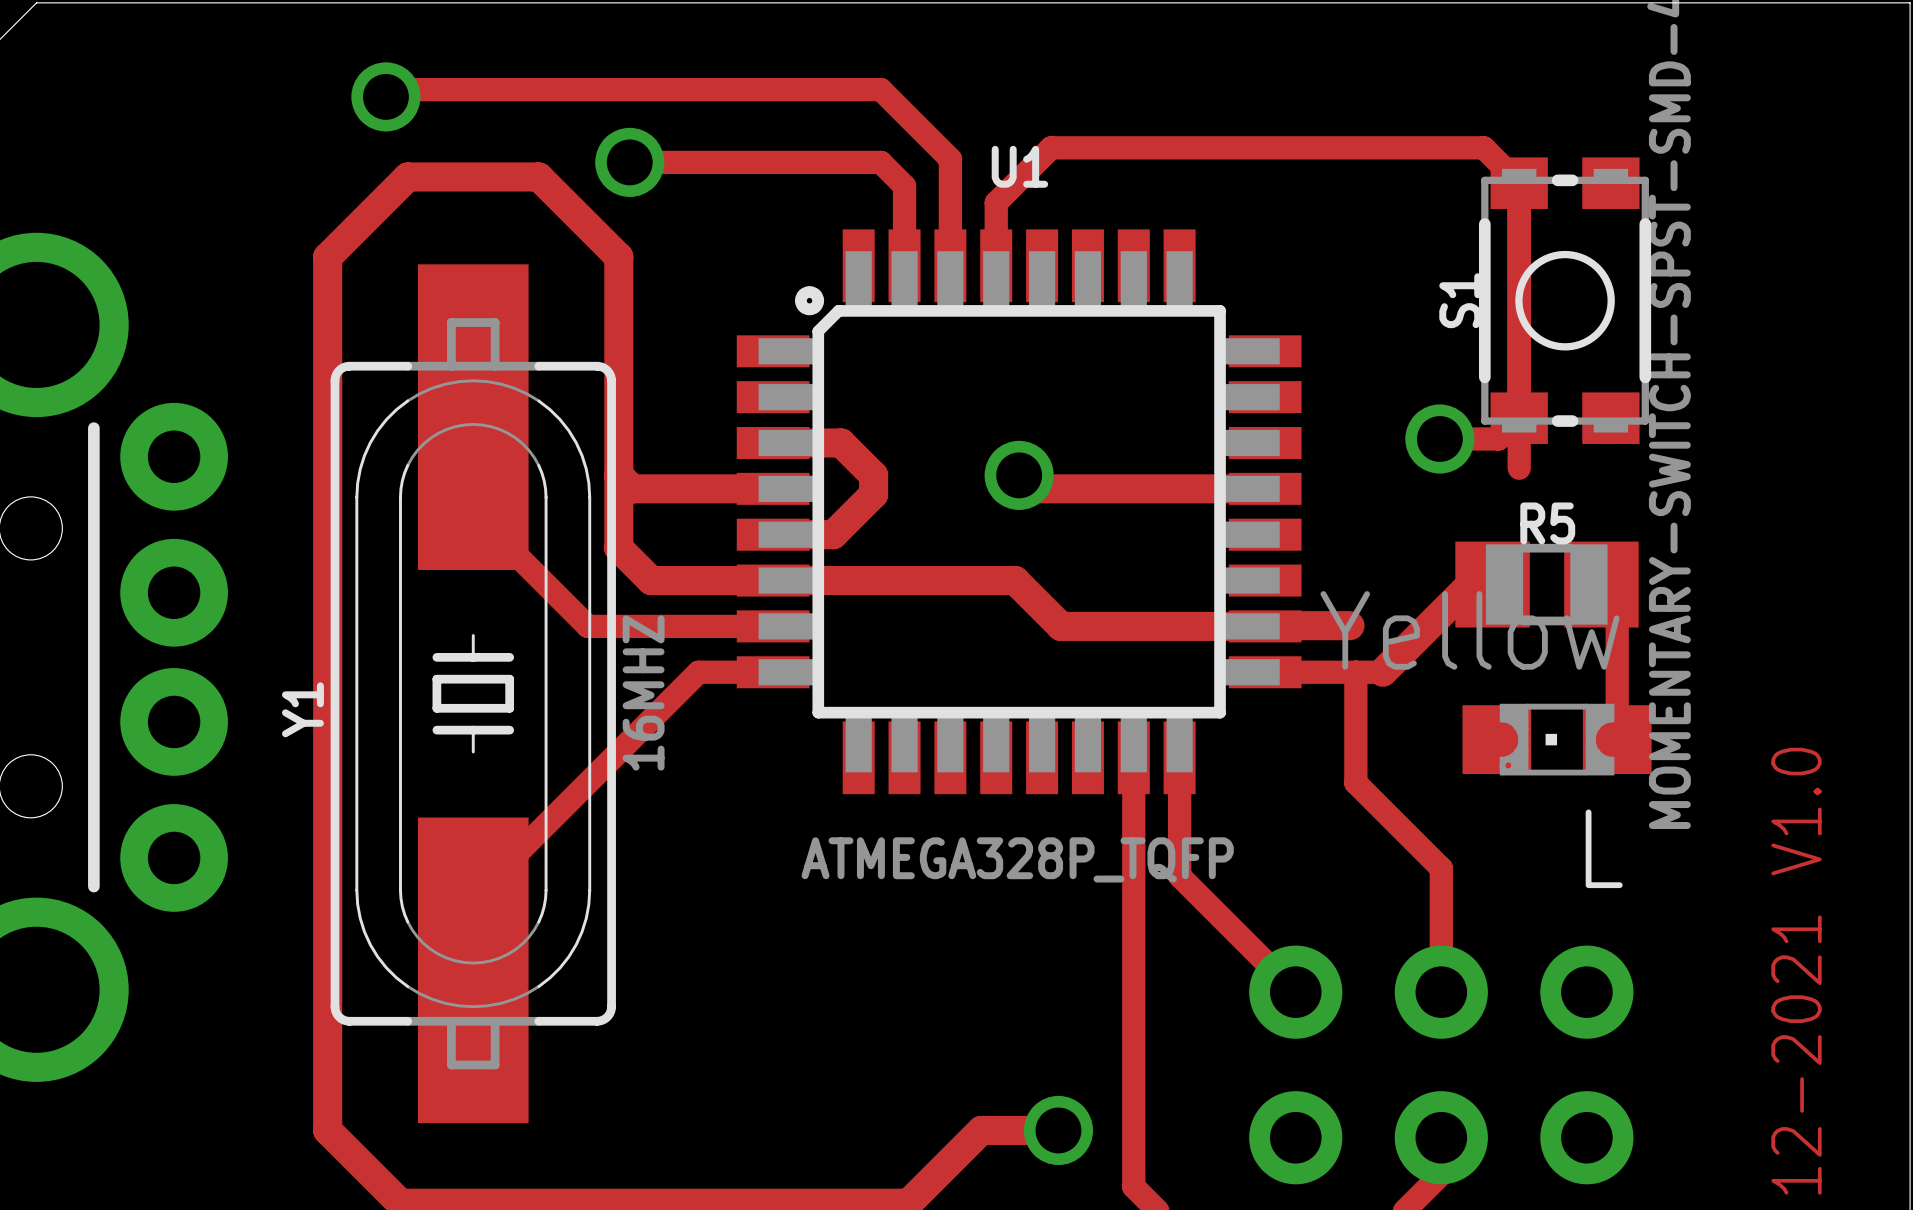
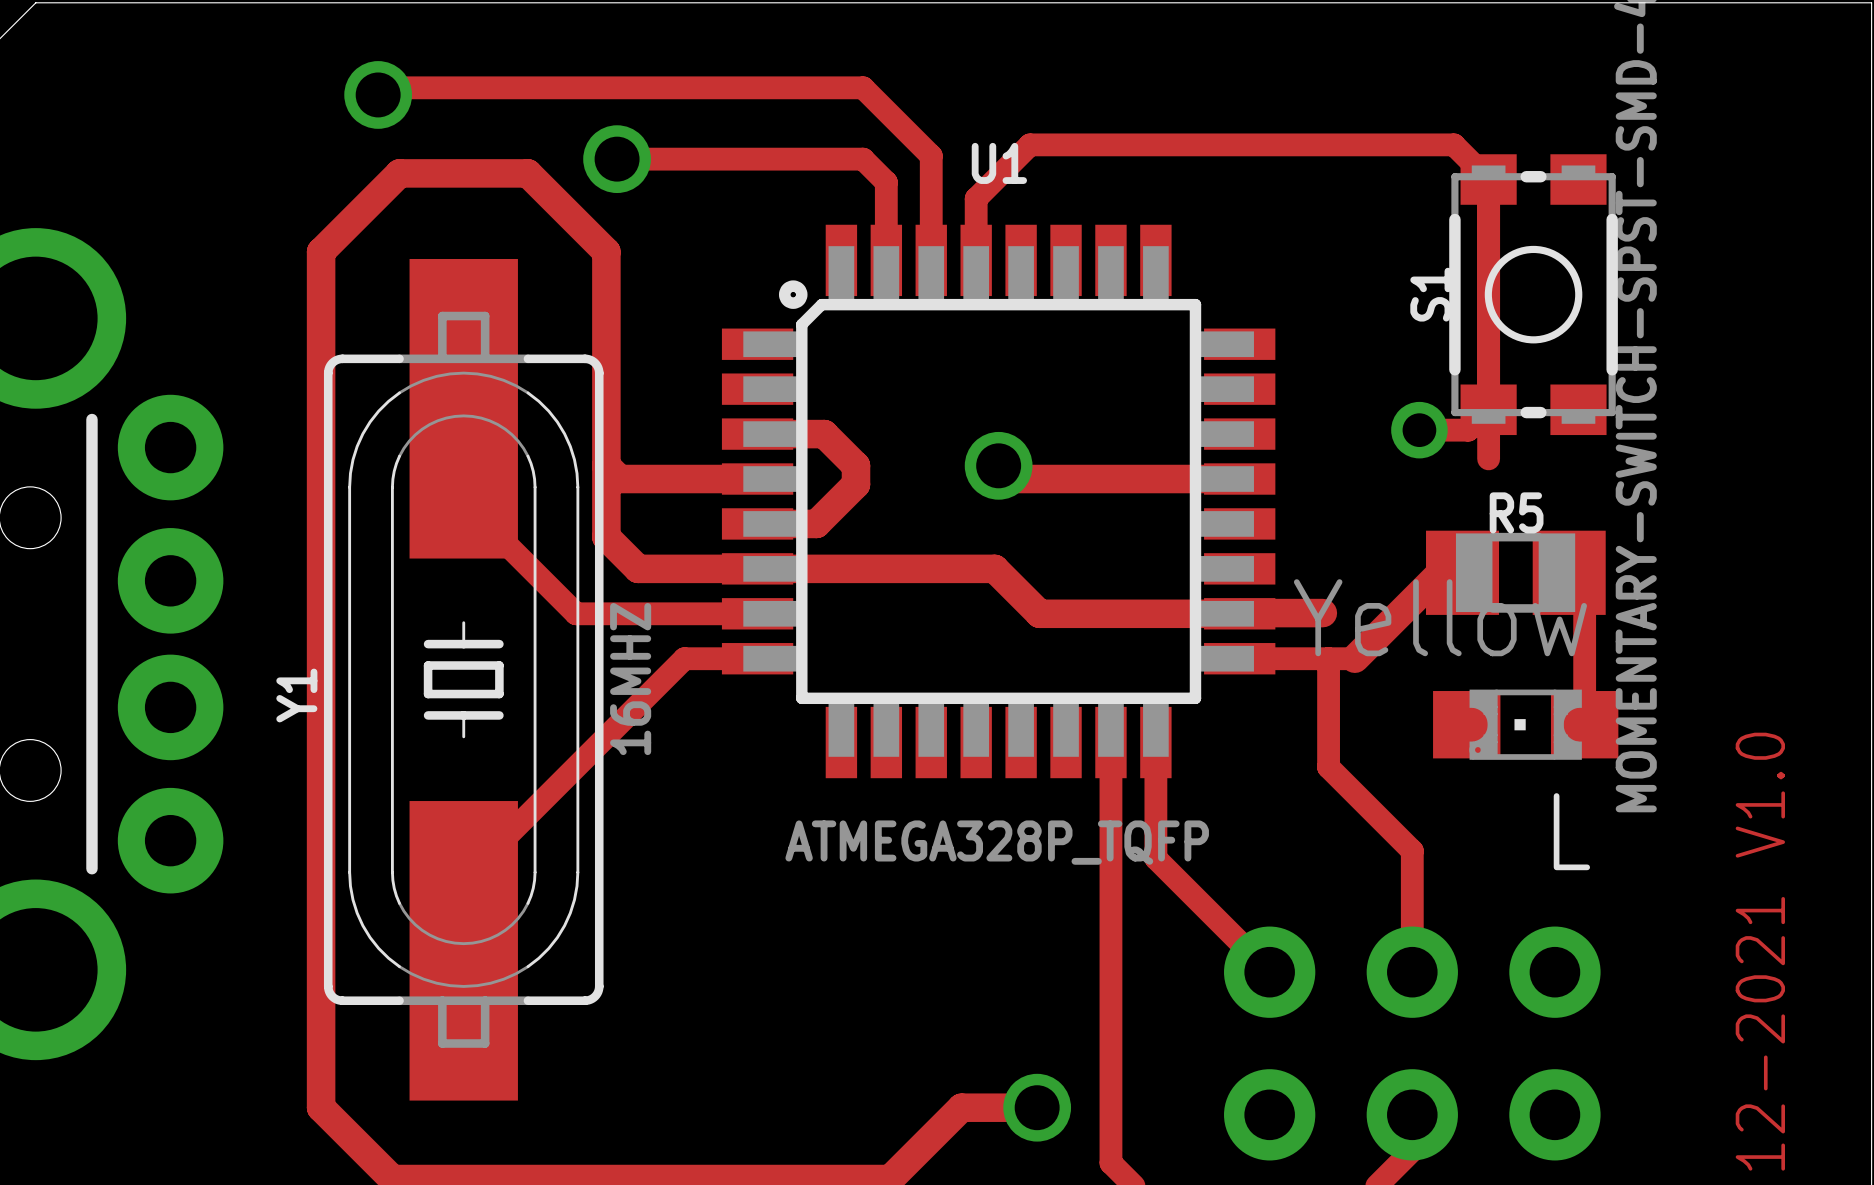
via size: [1405, 404, 1475, 474] -> [1391, 401, 1448, 459]

